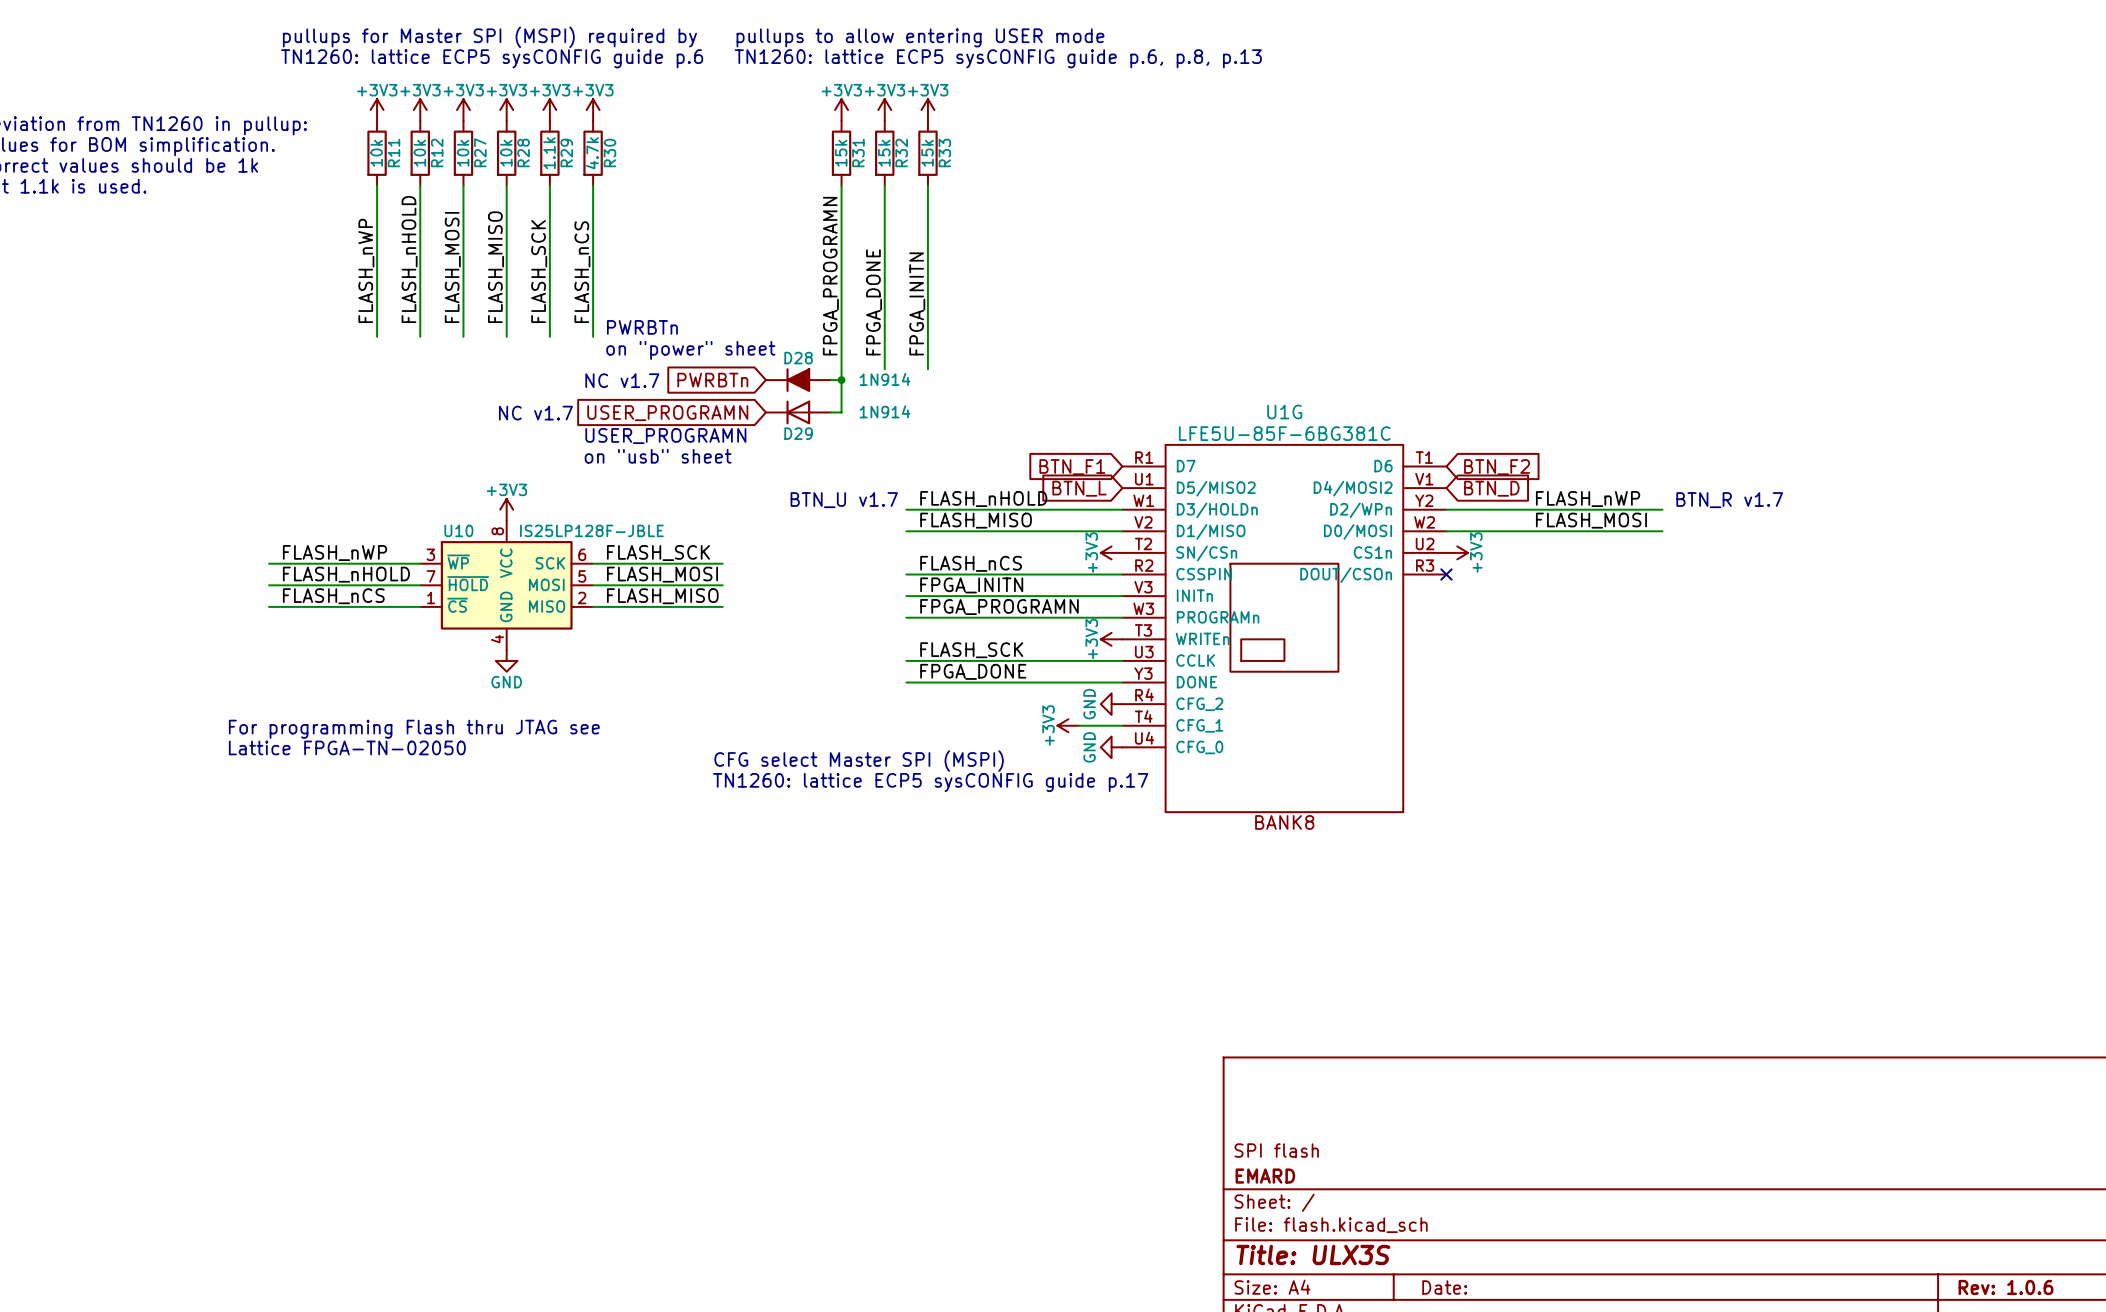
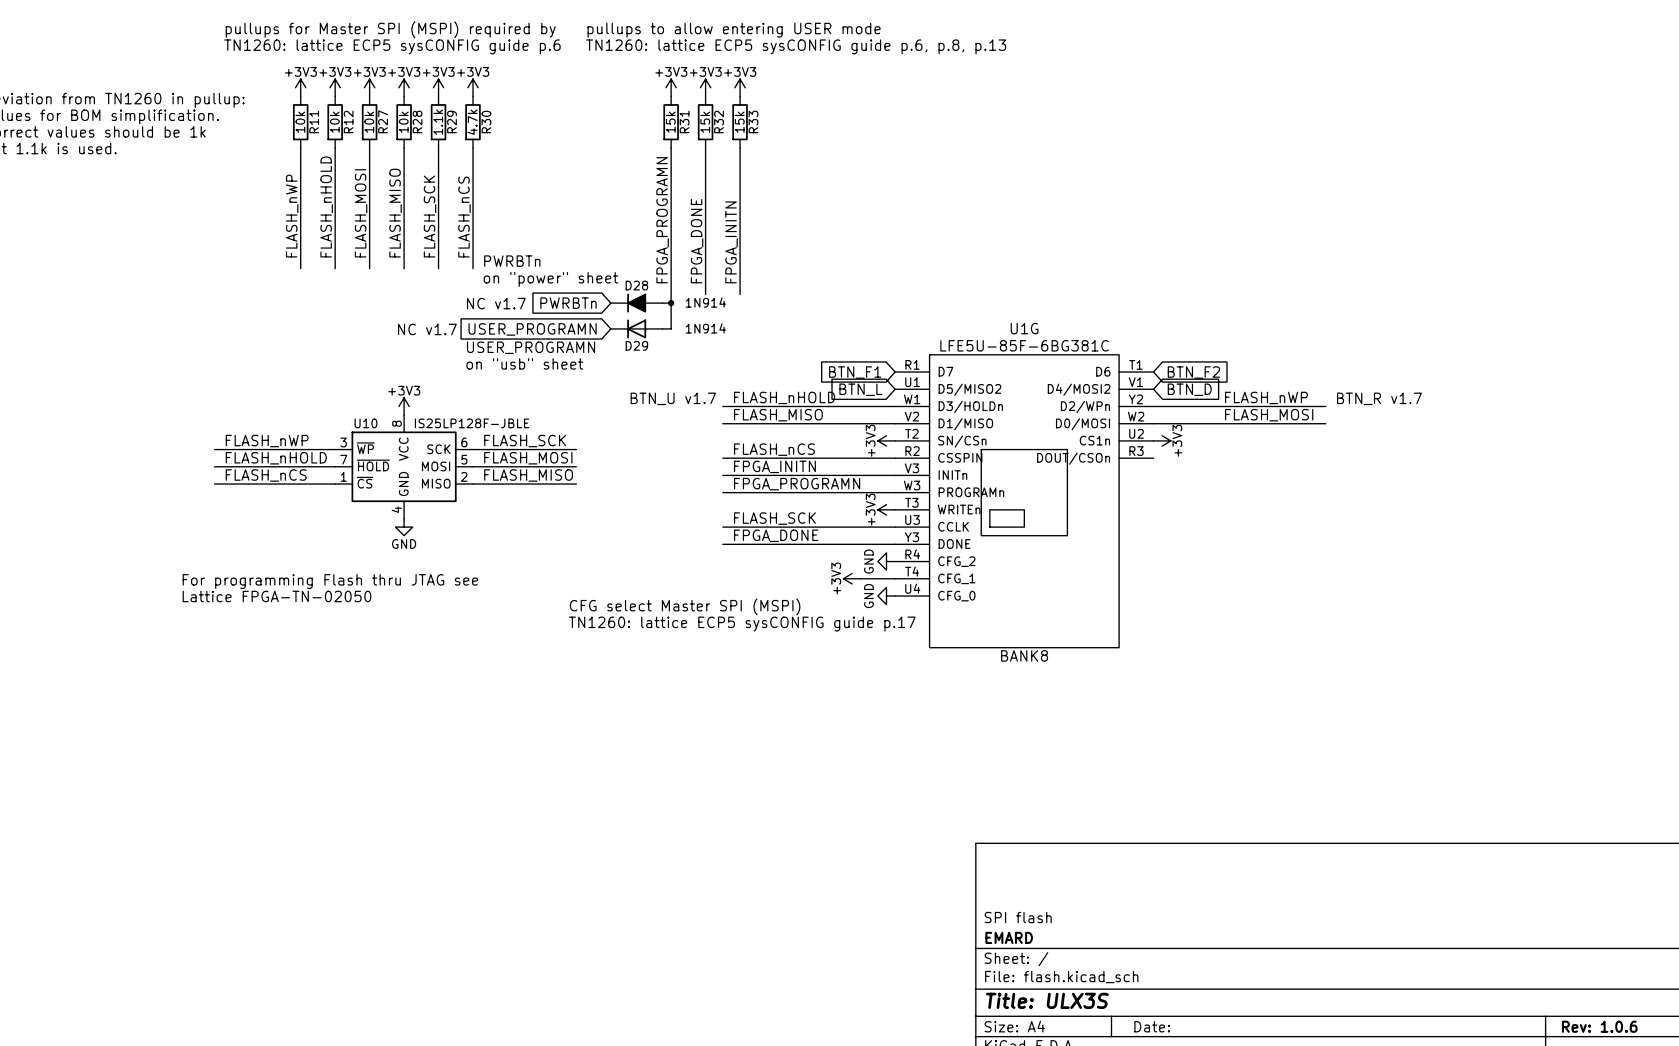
no-connect mark: (1446, 574) -> none

